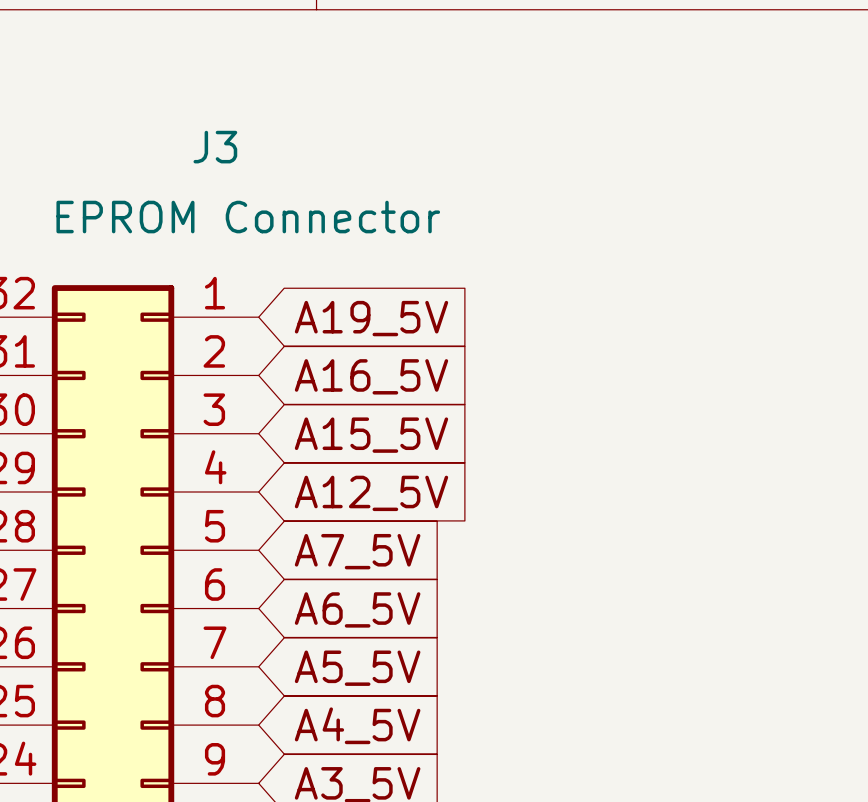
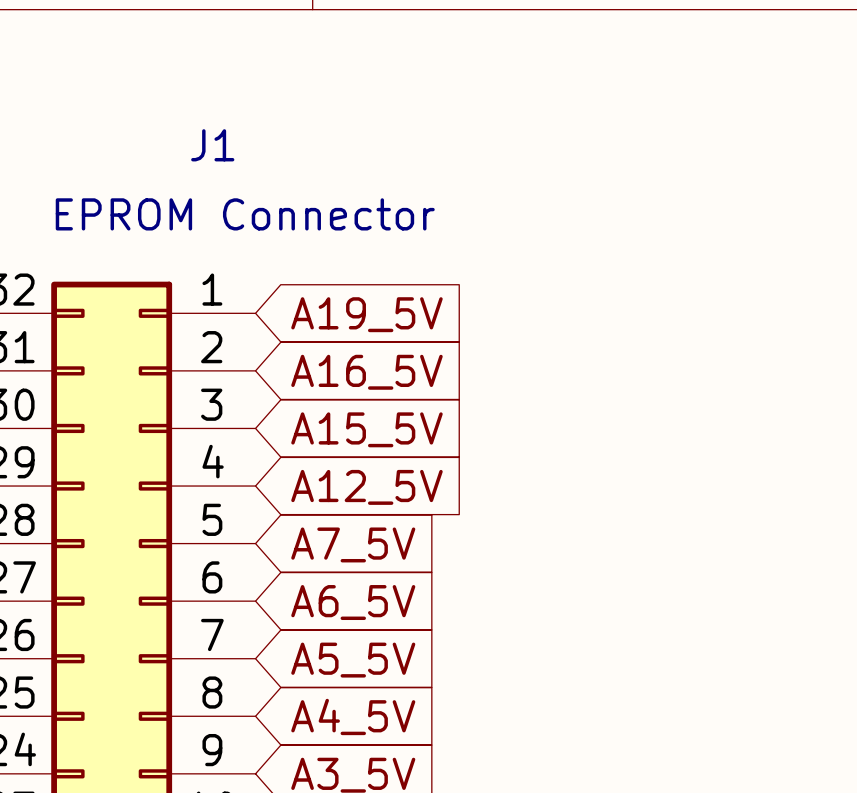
J3 name: J3 (215, 147) -> J1 (212, 145)

